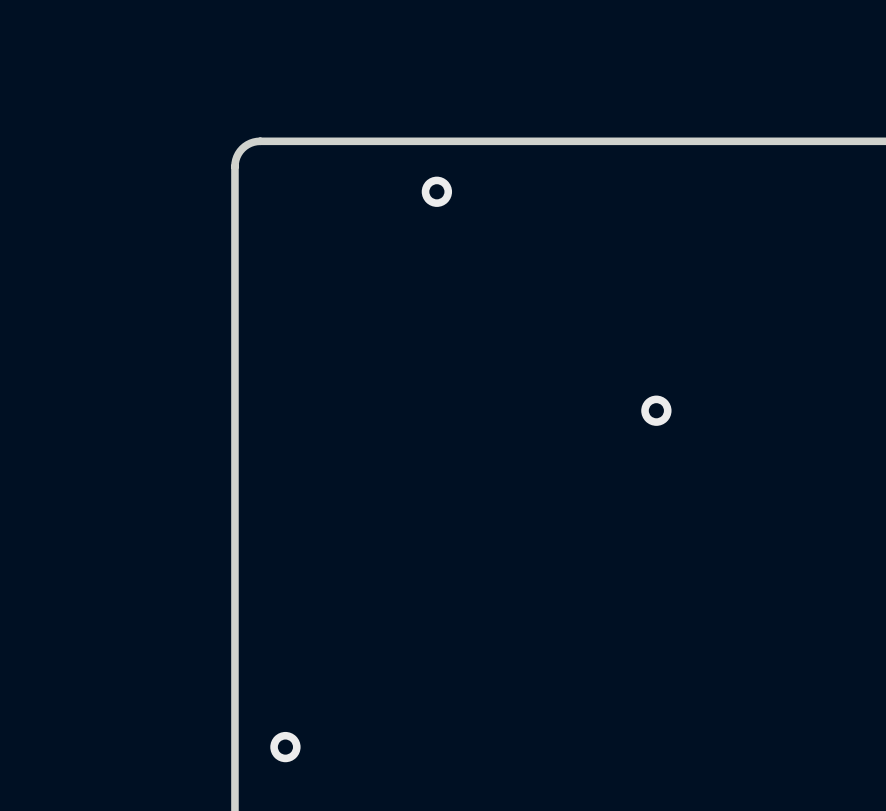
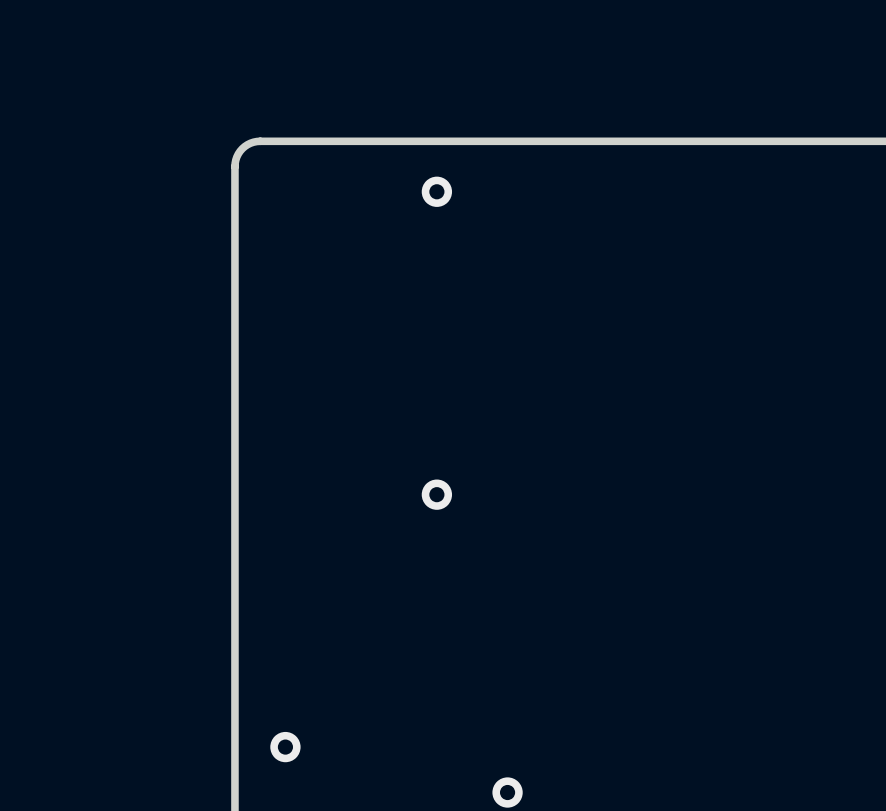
via: (656, 410) -> none
via: none -> (436, 494)
via: none -> (507, 792)

